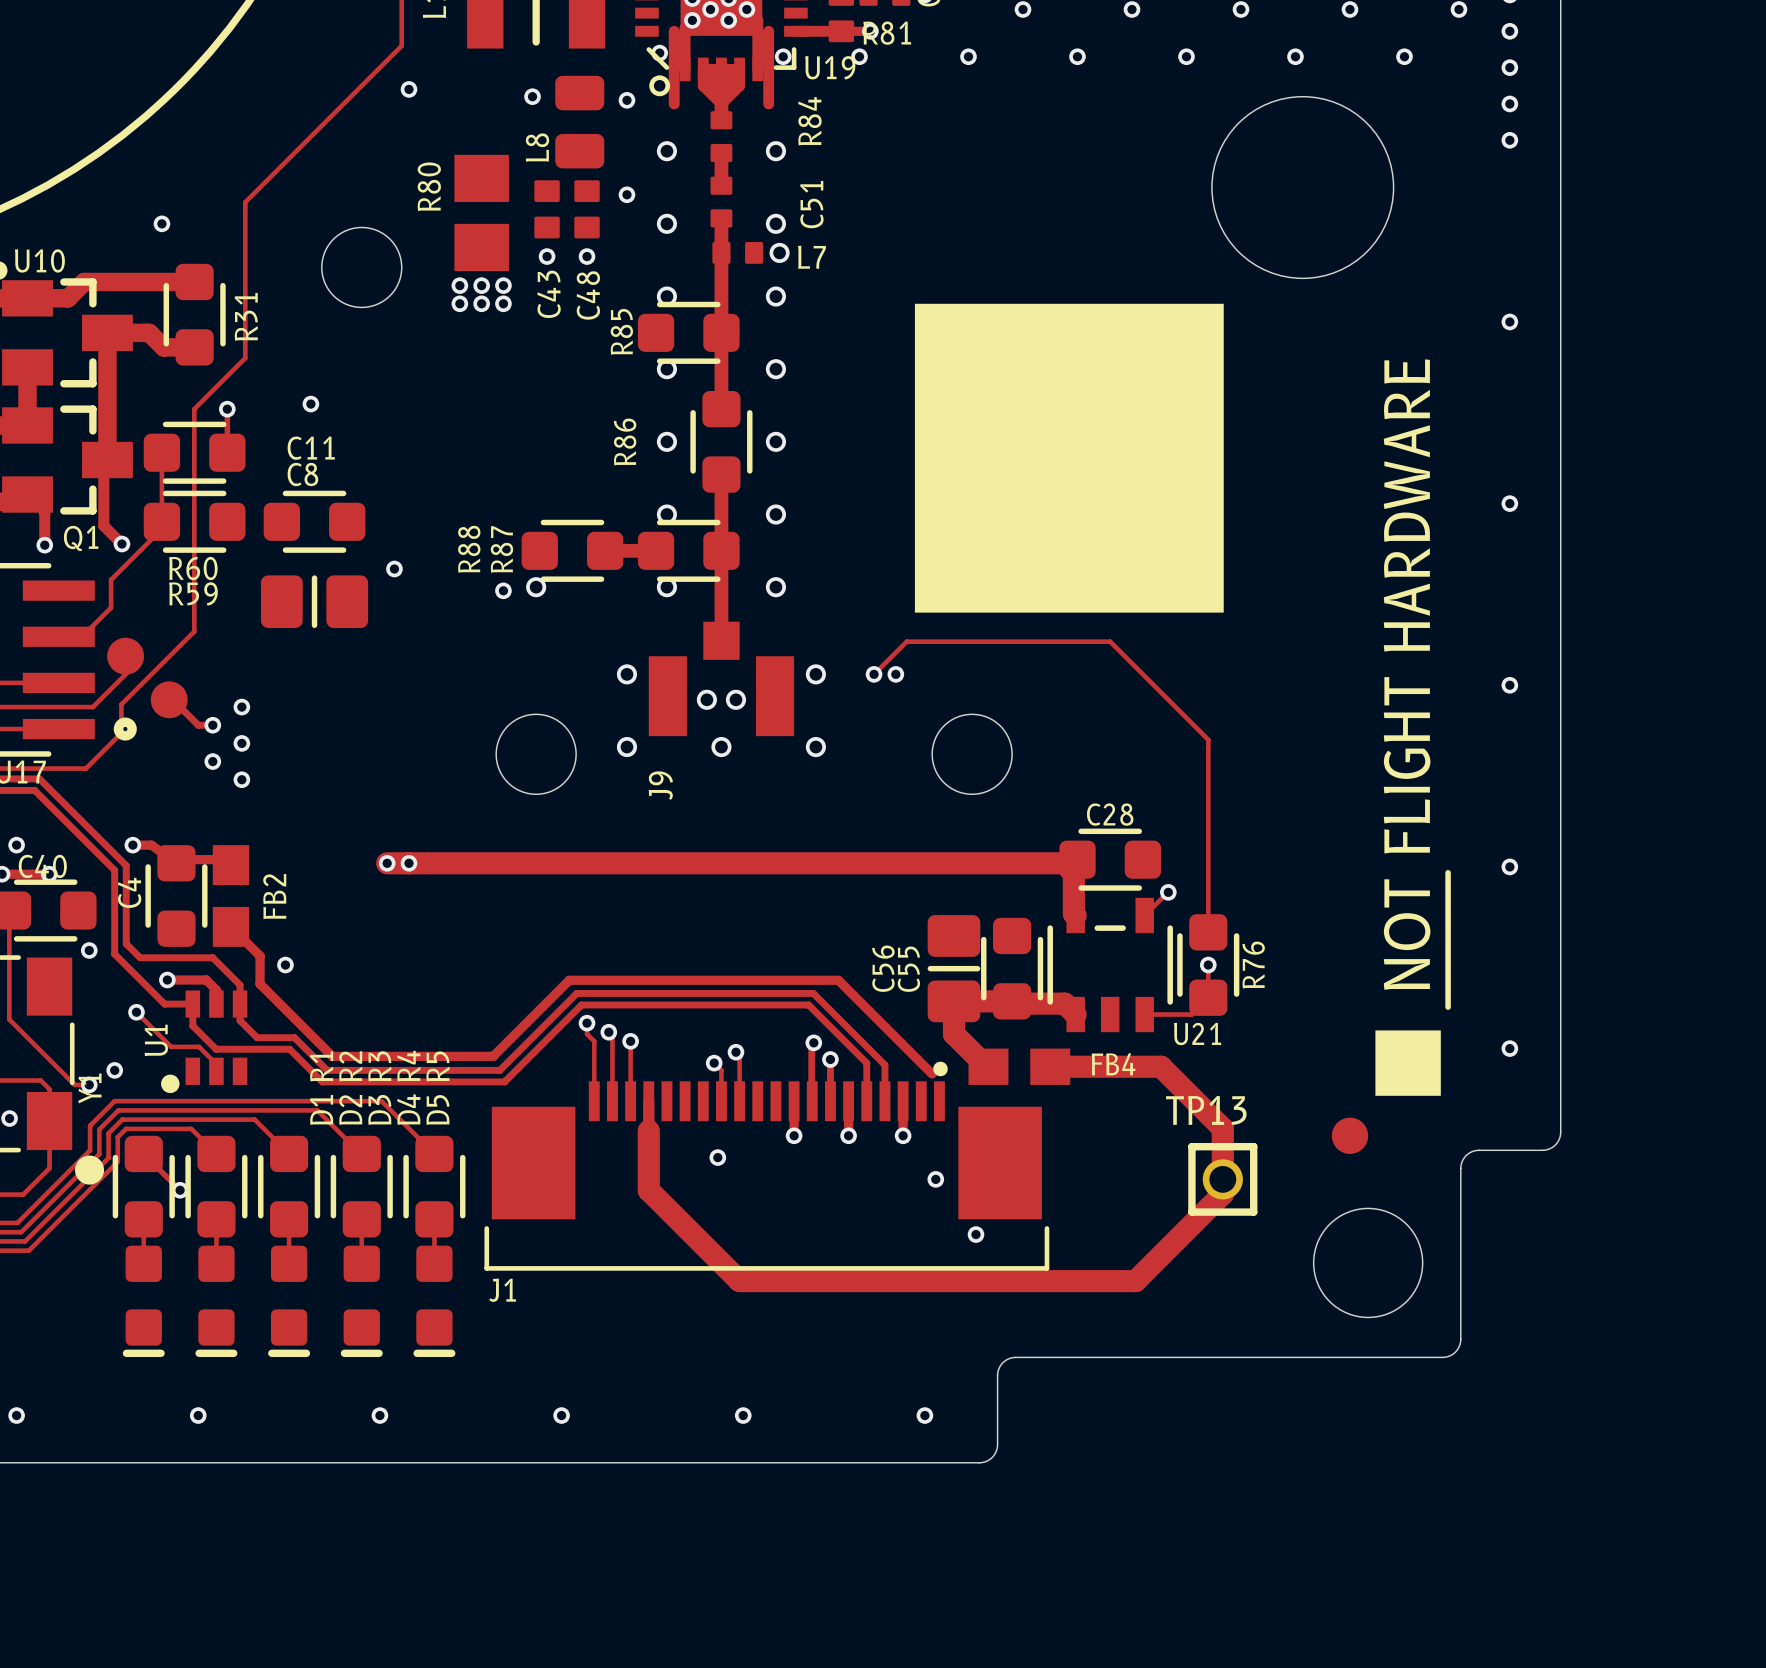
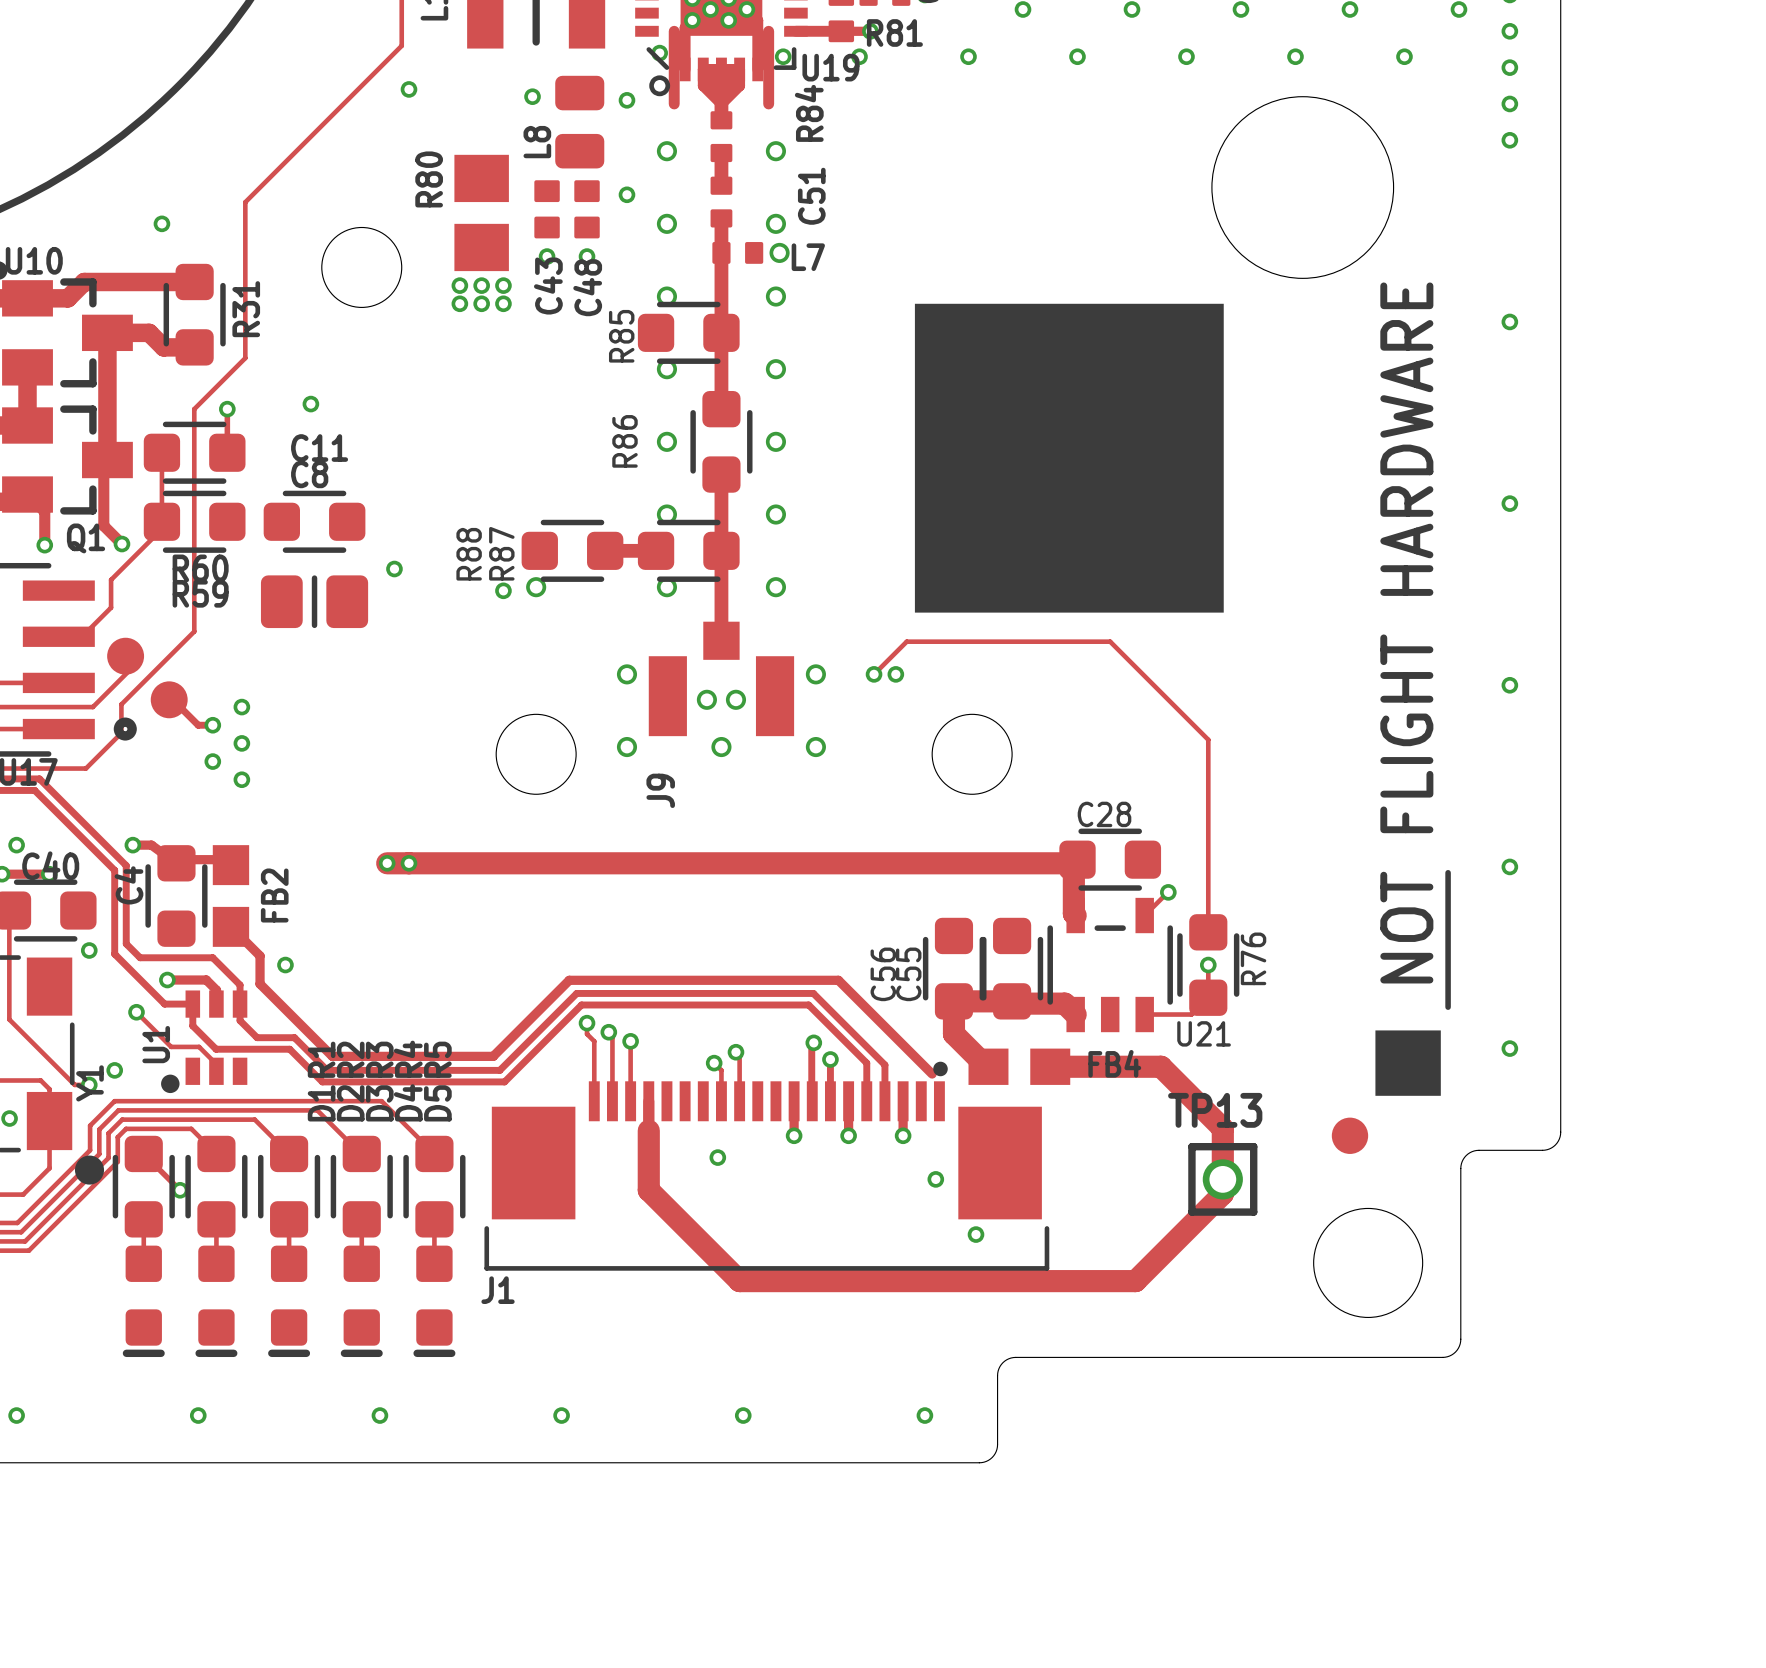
C56 footprint: [927, 915, 981, 1023] -> [922, 917, 986, 1020]

